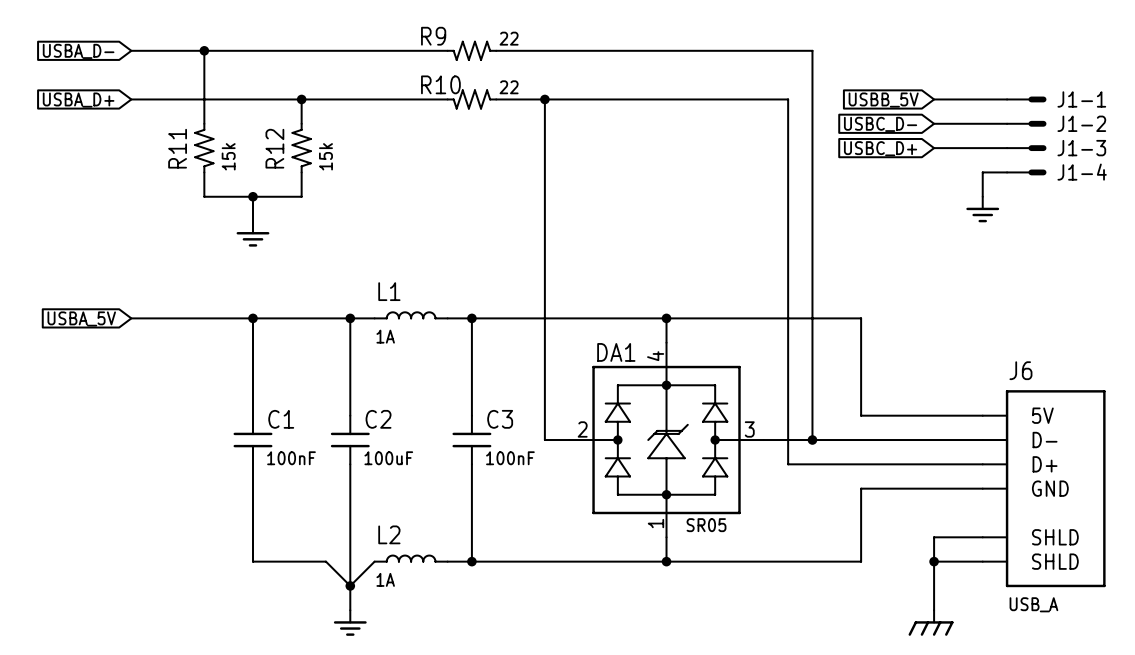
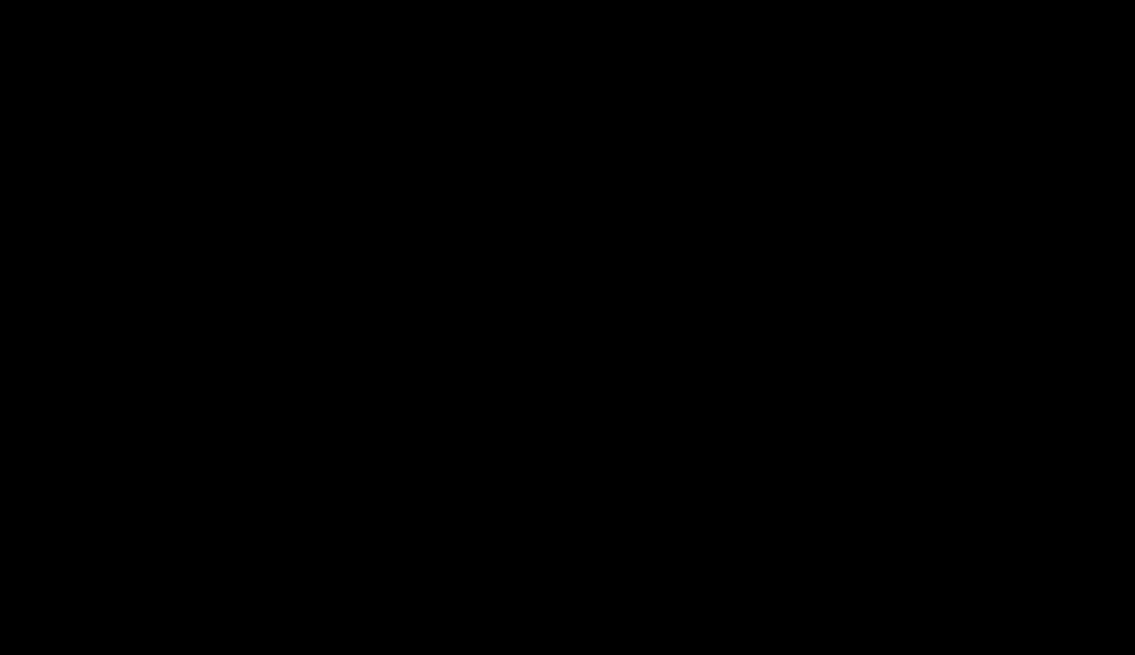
wire: (131, 50) (447, 50) -> none
wire: (204, 50) (204, 123) -> none
junction: (204, 50) -> none
R9: 22 (471, 50) -> none
wire: (496, 50) (812, 50) (812, 440) -> none
global label: USBA_D- (78, 51) -> none
wire: (131, 99) (447, 99) -> none
wire: (301, 99) (301, 123) -> none
junction: (301, 99) -> none
R10: 22 (471, 99) -> none
wire: (496, 99) (788, 99) (788, 464) (982, 464) -> none
wire: (544, 99) (544, 440) (569, 440) -> none
junction: (544, 99) -> none
wire: (934, 99) (1007, 99) -> none
J1-1: (1026, 99) -> none
global label: USBA_D+ (78, 100) -> none
global label: USBB_5V (883, 100) -> none
wire: (934, 123) (1007, 123) -> none
J1-2: (1026, 123) -> none
global label: USBC_D- (880, 124) -> none
R11: 15k (204, 148) -> none
R12: 15k (301, 148) -> none
global label: USBC_D+ (880, 148) -> none
wire: (934, 148) (1007, 148) -> none
J1-3: (1026, 148) -> none
wire: (204, 172) (204, 196) (301, 196) (301, 172) -> none
wire: (1007, 172) (982, 172) (982, 196) -> none
J1-4: (1026, 172) -> none
wire: (252, 196) (252, 221) -> none
junction: (252, 196) -> none
power symbol: (982, 209) -> none
power symbol: (252, 233) -> none
L1: 1A (411, 315) -> none
global label: USBA_5V (81, 318) -> none
wire: (131, 318) (374, 318) -> none
wire: (252, 318) (252, 415) -> none
junction: (252, 318) -> none
wire: (350, 318) (350, 415) -> none
junction: (350, 318) -> none
wire: (447, 318) (861, 318) (861, 415) (982, 415) -> none
wire: (471, 318) (471, 415) -> none
junction: (471, 318) -> none
wire: (666, 318) (666, 342) -> none
junction: (666, 318) -> none
C1: 100nF (252, 440) -> none
C2: 100uF (350, 440) -> none
C3: 100nF (471, 440) -> none
DA1: SR05 (666, 440) -> none
wire: (763, 440) (982, 440) -> none
junction: (812, 440) -> none
wire: (252, 464) (252, 561) (325, 561) (350, 585) (374, 561) -> none
wire: (350, 464) (350, 610) -> none
wire: (471, 464) (471, 561) -> none
wire: (982, 488) (861, 488) (861, 561) (447, 561) -> none
J6: USB_A (1044, 488) -> none
wire: (666, 537) (666, 561) -> none
wire: (982, 537) (934, 537) (934, 610) -> none
L2: 1A (411, 558) -> none
junction: (471, 561) -> none
junction: (666, 561) -> none
wire: (934, 561) (982, 561) -> none
junction: (934, 561) -> none
junction: (350, 585) -> none
power symbol: (350, 622) -> none
power symbol: (931, 622) -> none

